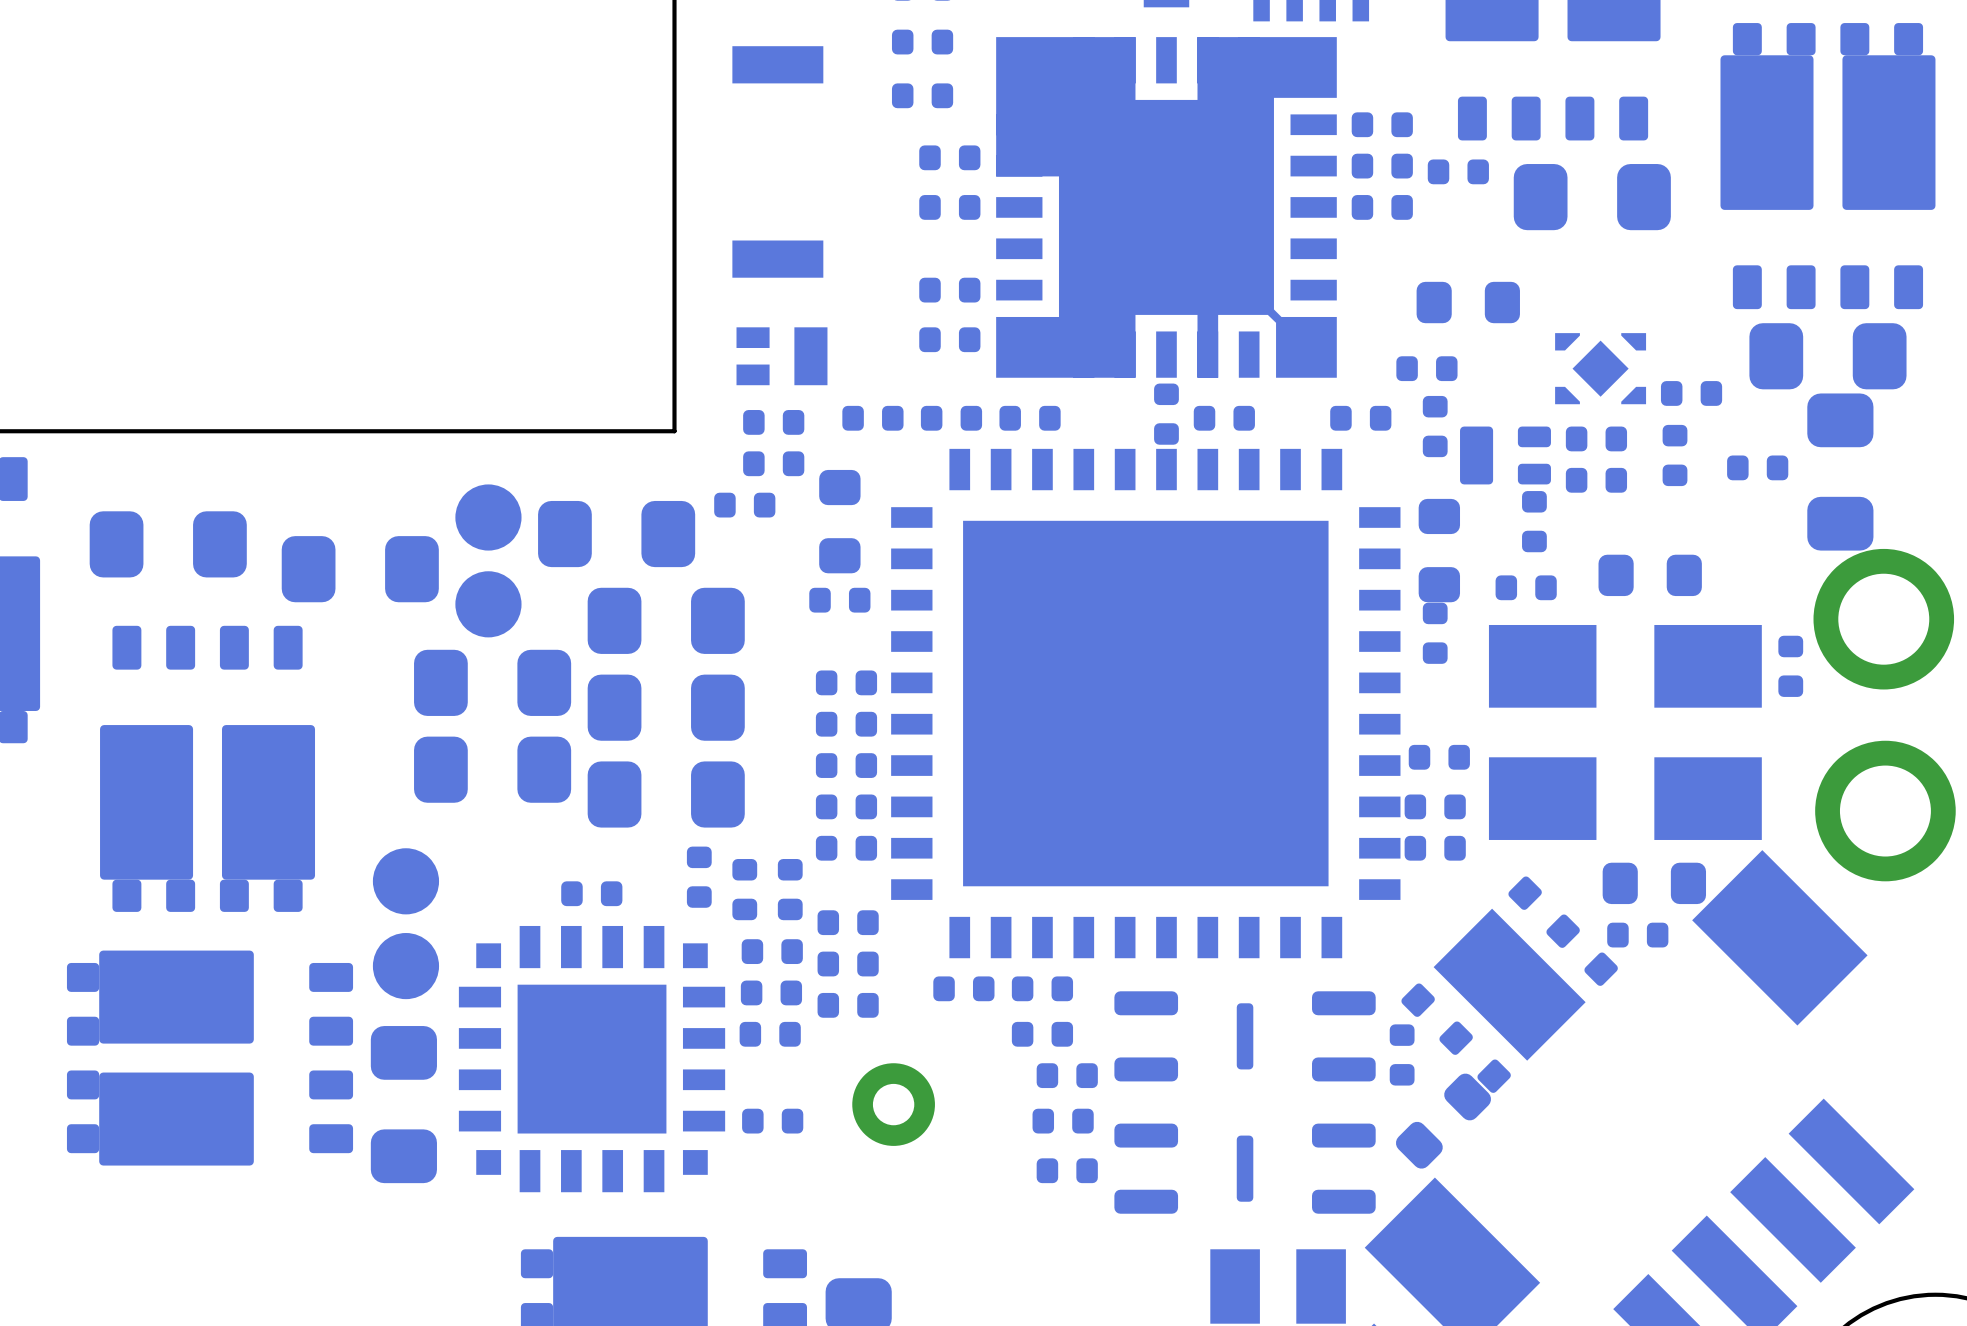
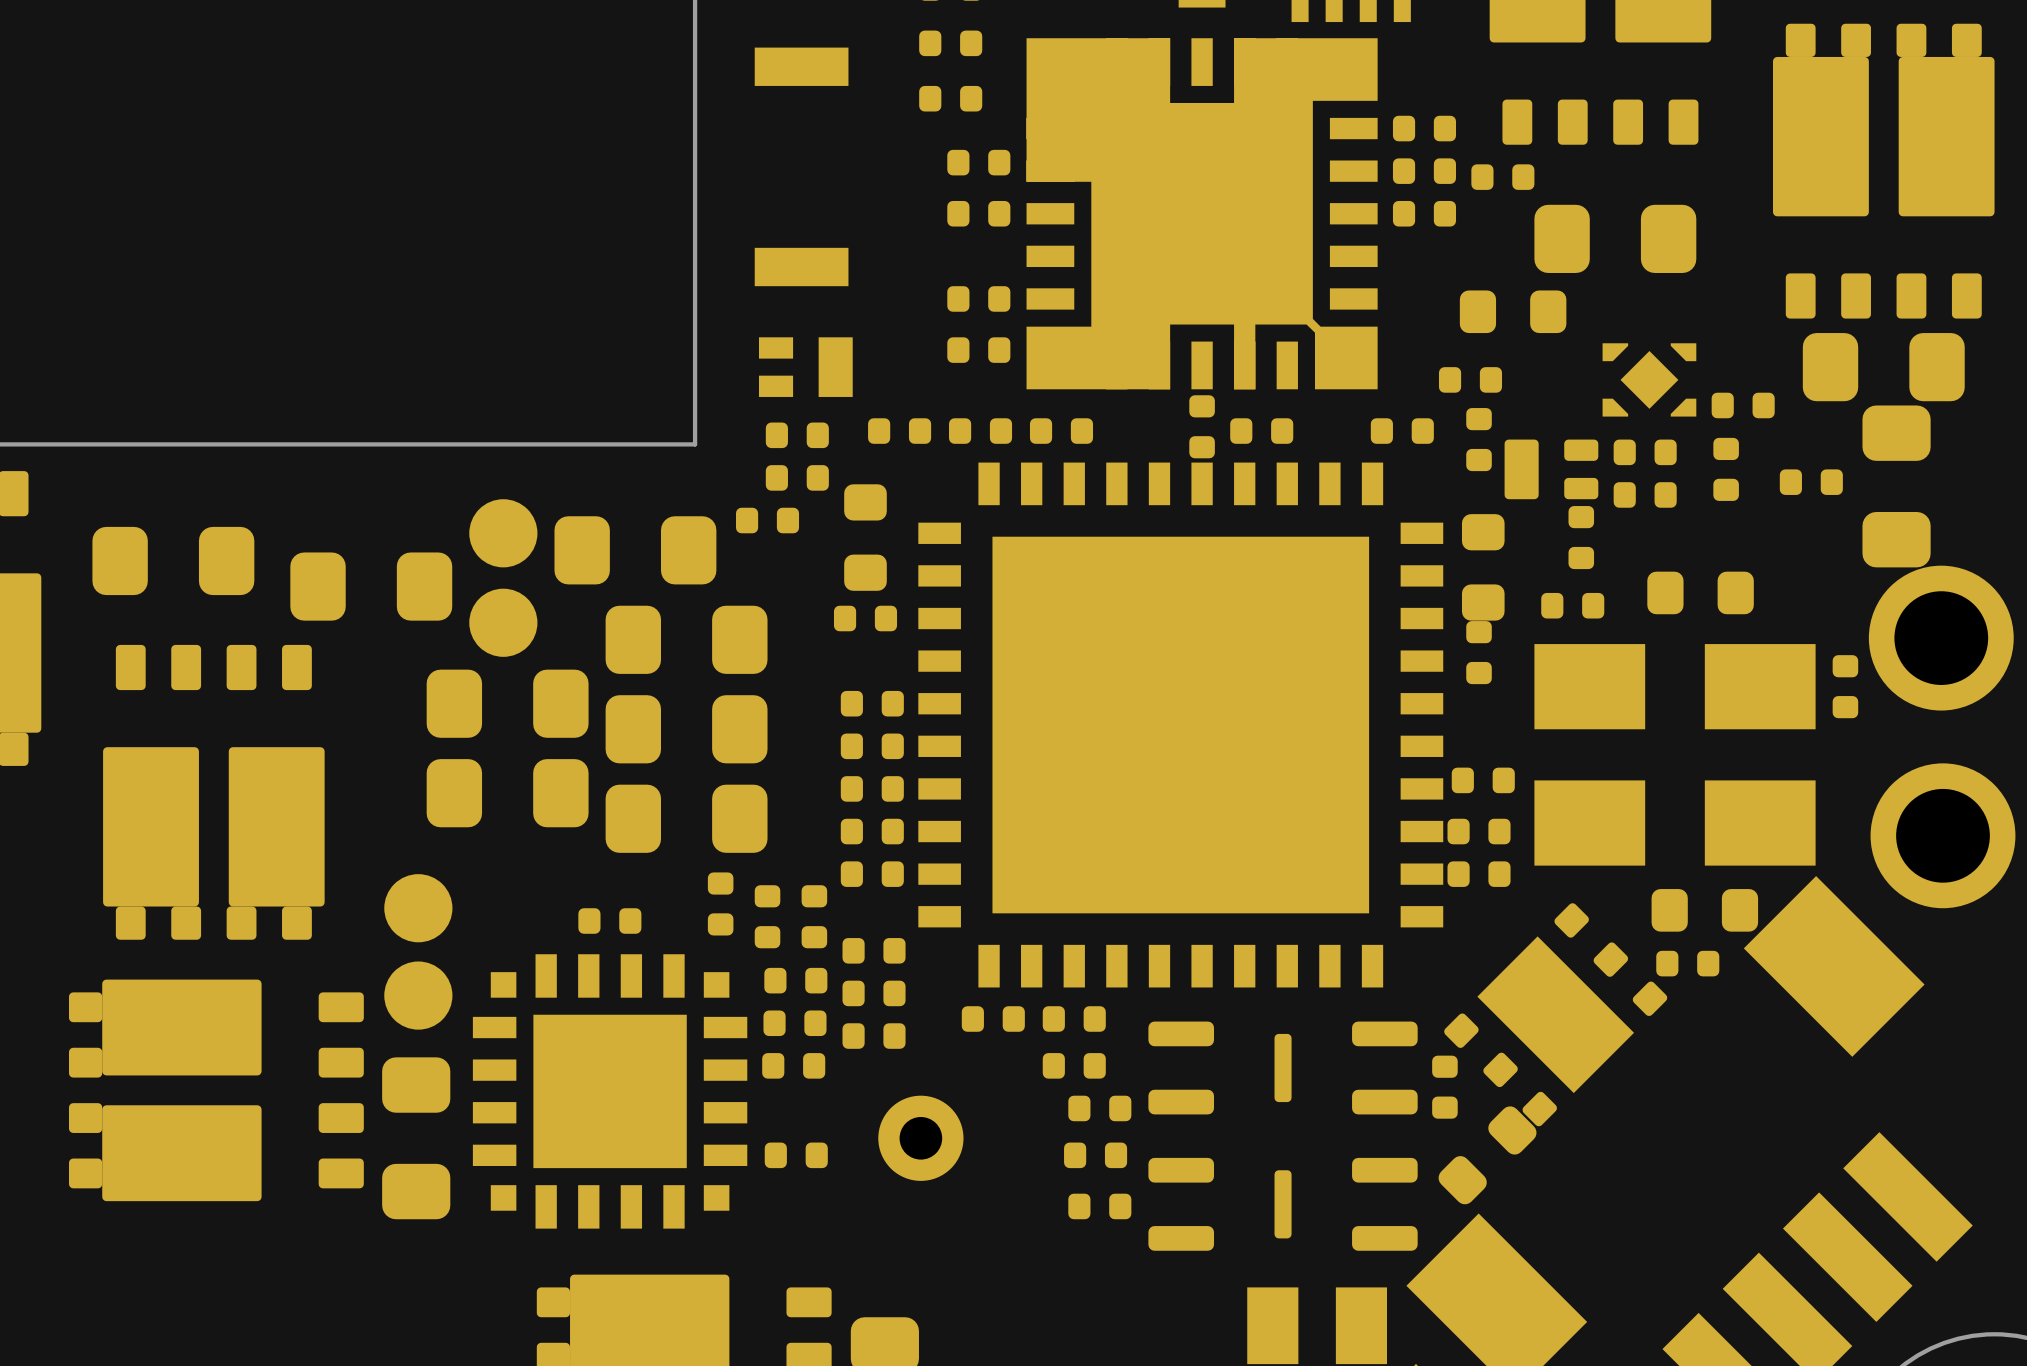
part position: (1592, 197) -> (1615, 238)

